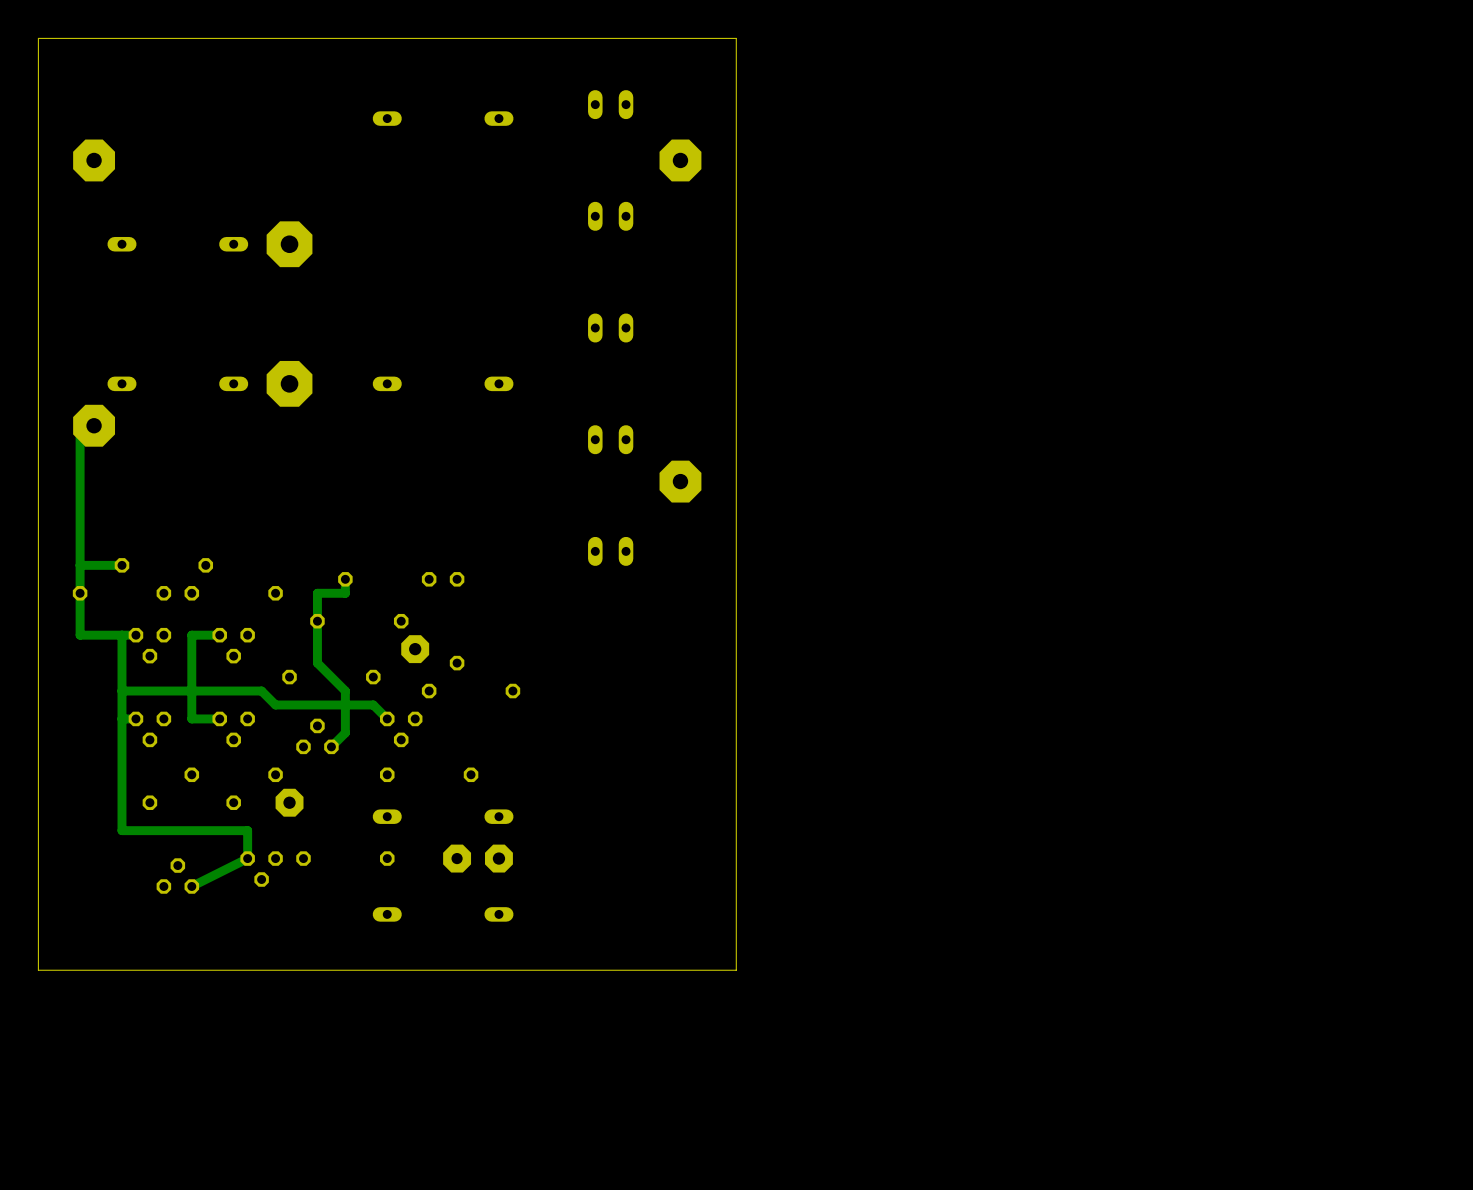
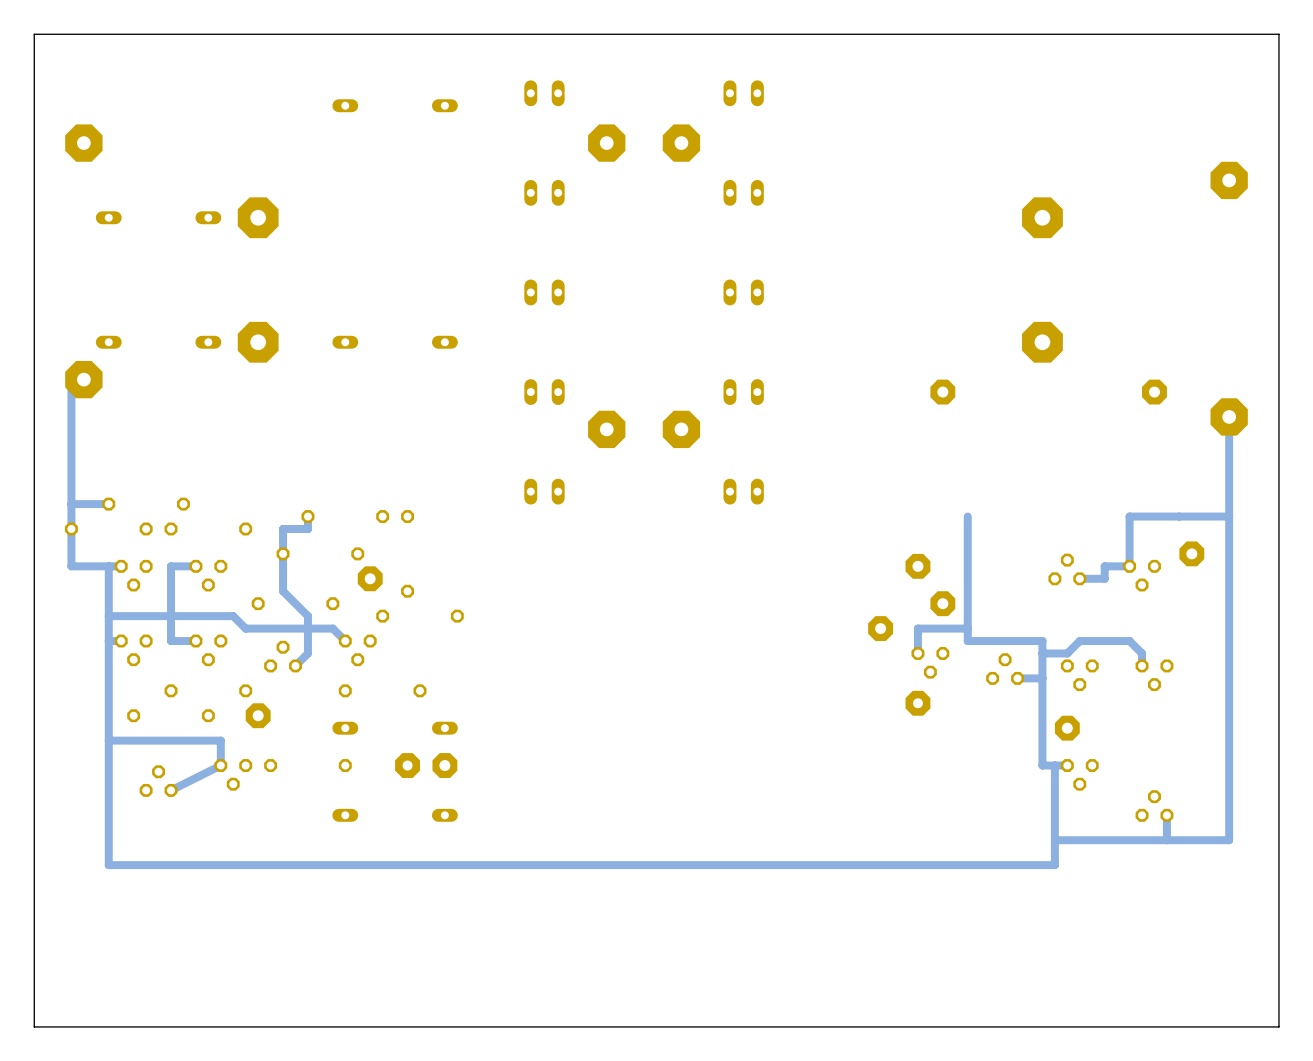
board edge: (736, 38) (736, 970) (38, 970) -> (656, 34) (1278, 34) (1278, 1026) (34, 1026) (34, 865)
part: none -> (743, 93)
part: none -> (681, 143)
part: none -> (1229, 180)
part: none -> (743, 192)
part: none -> (1042, 217)
part: none -> (743, 292)
part: none -> (1042, 342)
part: none -> (743, 392)
part: none -> (942, 392)
part: none -> (1154, 392)
track: none -> (1229, 416) (1229, 840) (1054, 840)
part: none -> (1229, 416)
part: none -> (681, 429)
part: none -> (743, 491)
track: none -> (967, 516) (967, 641) (1042, 641) (1042, 765) (1067, 765)
track: none -> (1229, 516) (1129, 516) (1129, 566) (1104, 566) (1104, 578) (1079, 578)
part: none -> (1191, 553)
part: none -> (917, 566)
part: none -> (1067, 569)
part: none -> (1142, 575)
part: none -> (942, 603)
part: none -> (880, 628)
track: none -> (967, 628) (917, 628) (917, 653)
track: none -> (1042, 653) (1067, 653) (1079, 641) (1129, 641) (1142, 653) (1142, 665)
part: none -> (930, 662)
part: none -> (1005, 669)
part: none -> (1079, 675)
part: none -> (1154, 675)
track: none -> (1042, 678) (1017, 678)
part: none -> (917, 703)
part: none -> (1067, 728)
track: none -> (108, 740) (108, 865) (1054, 865) (1054, 765)
part: none -> (1079, 774)
part: none -> (1154, 805)
track: none -> (1166, 815) (1166, 840)

